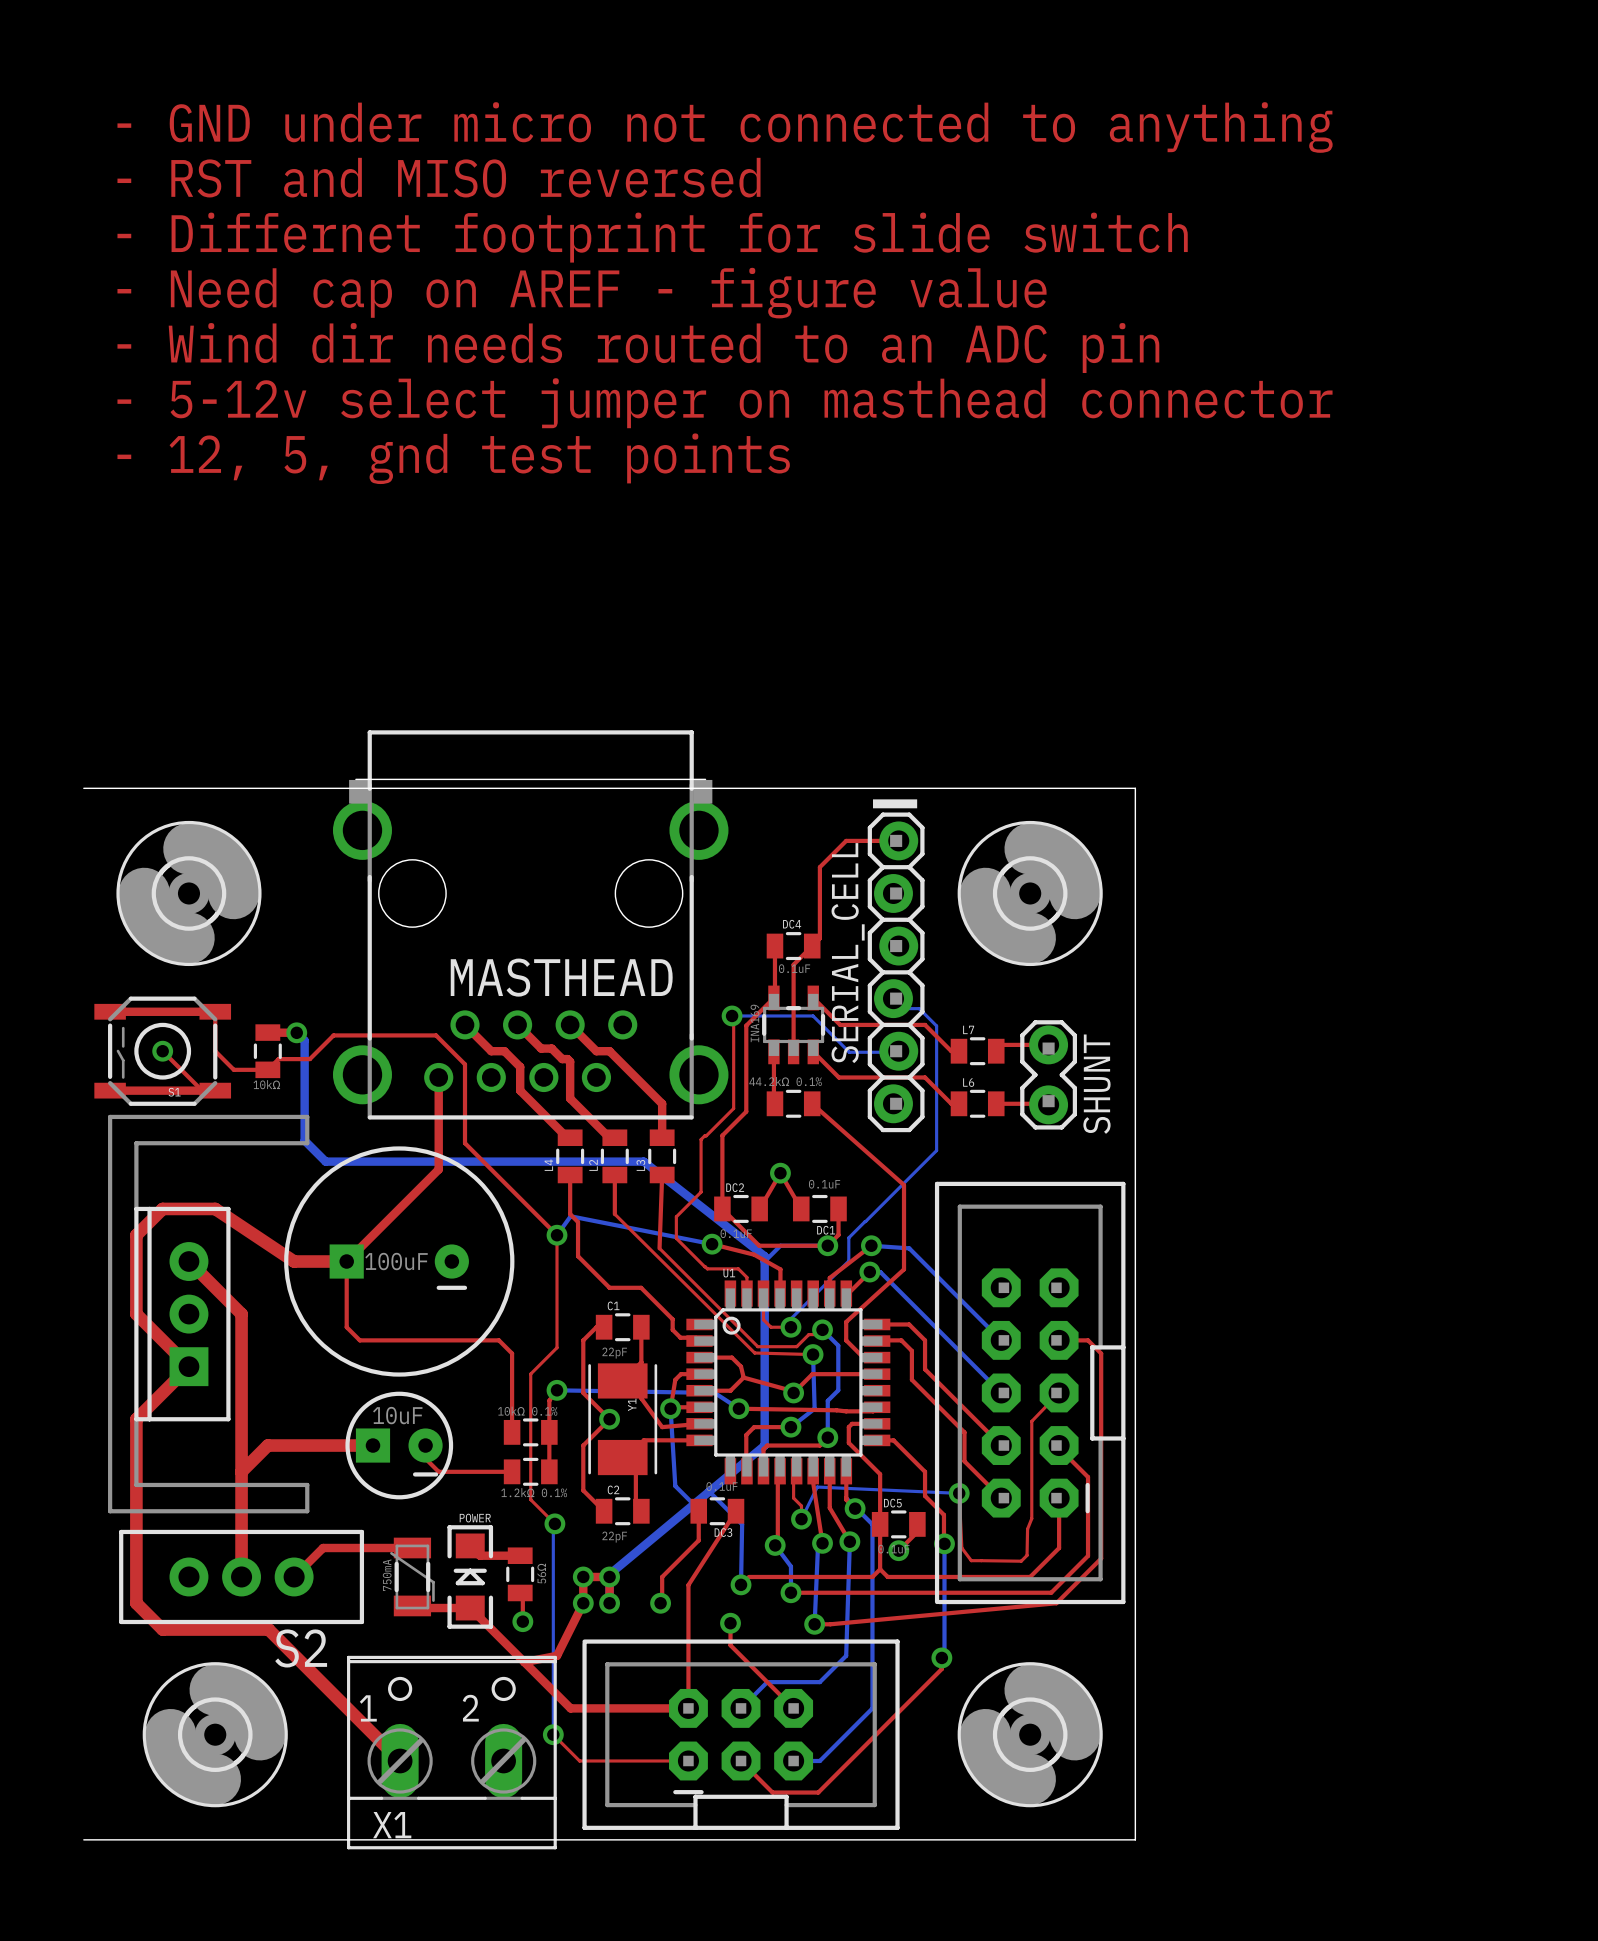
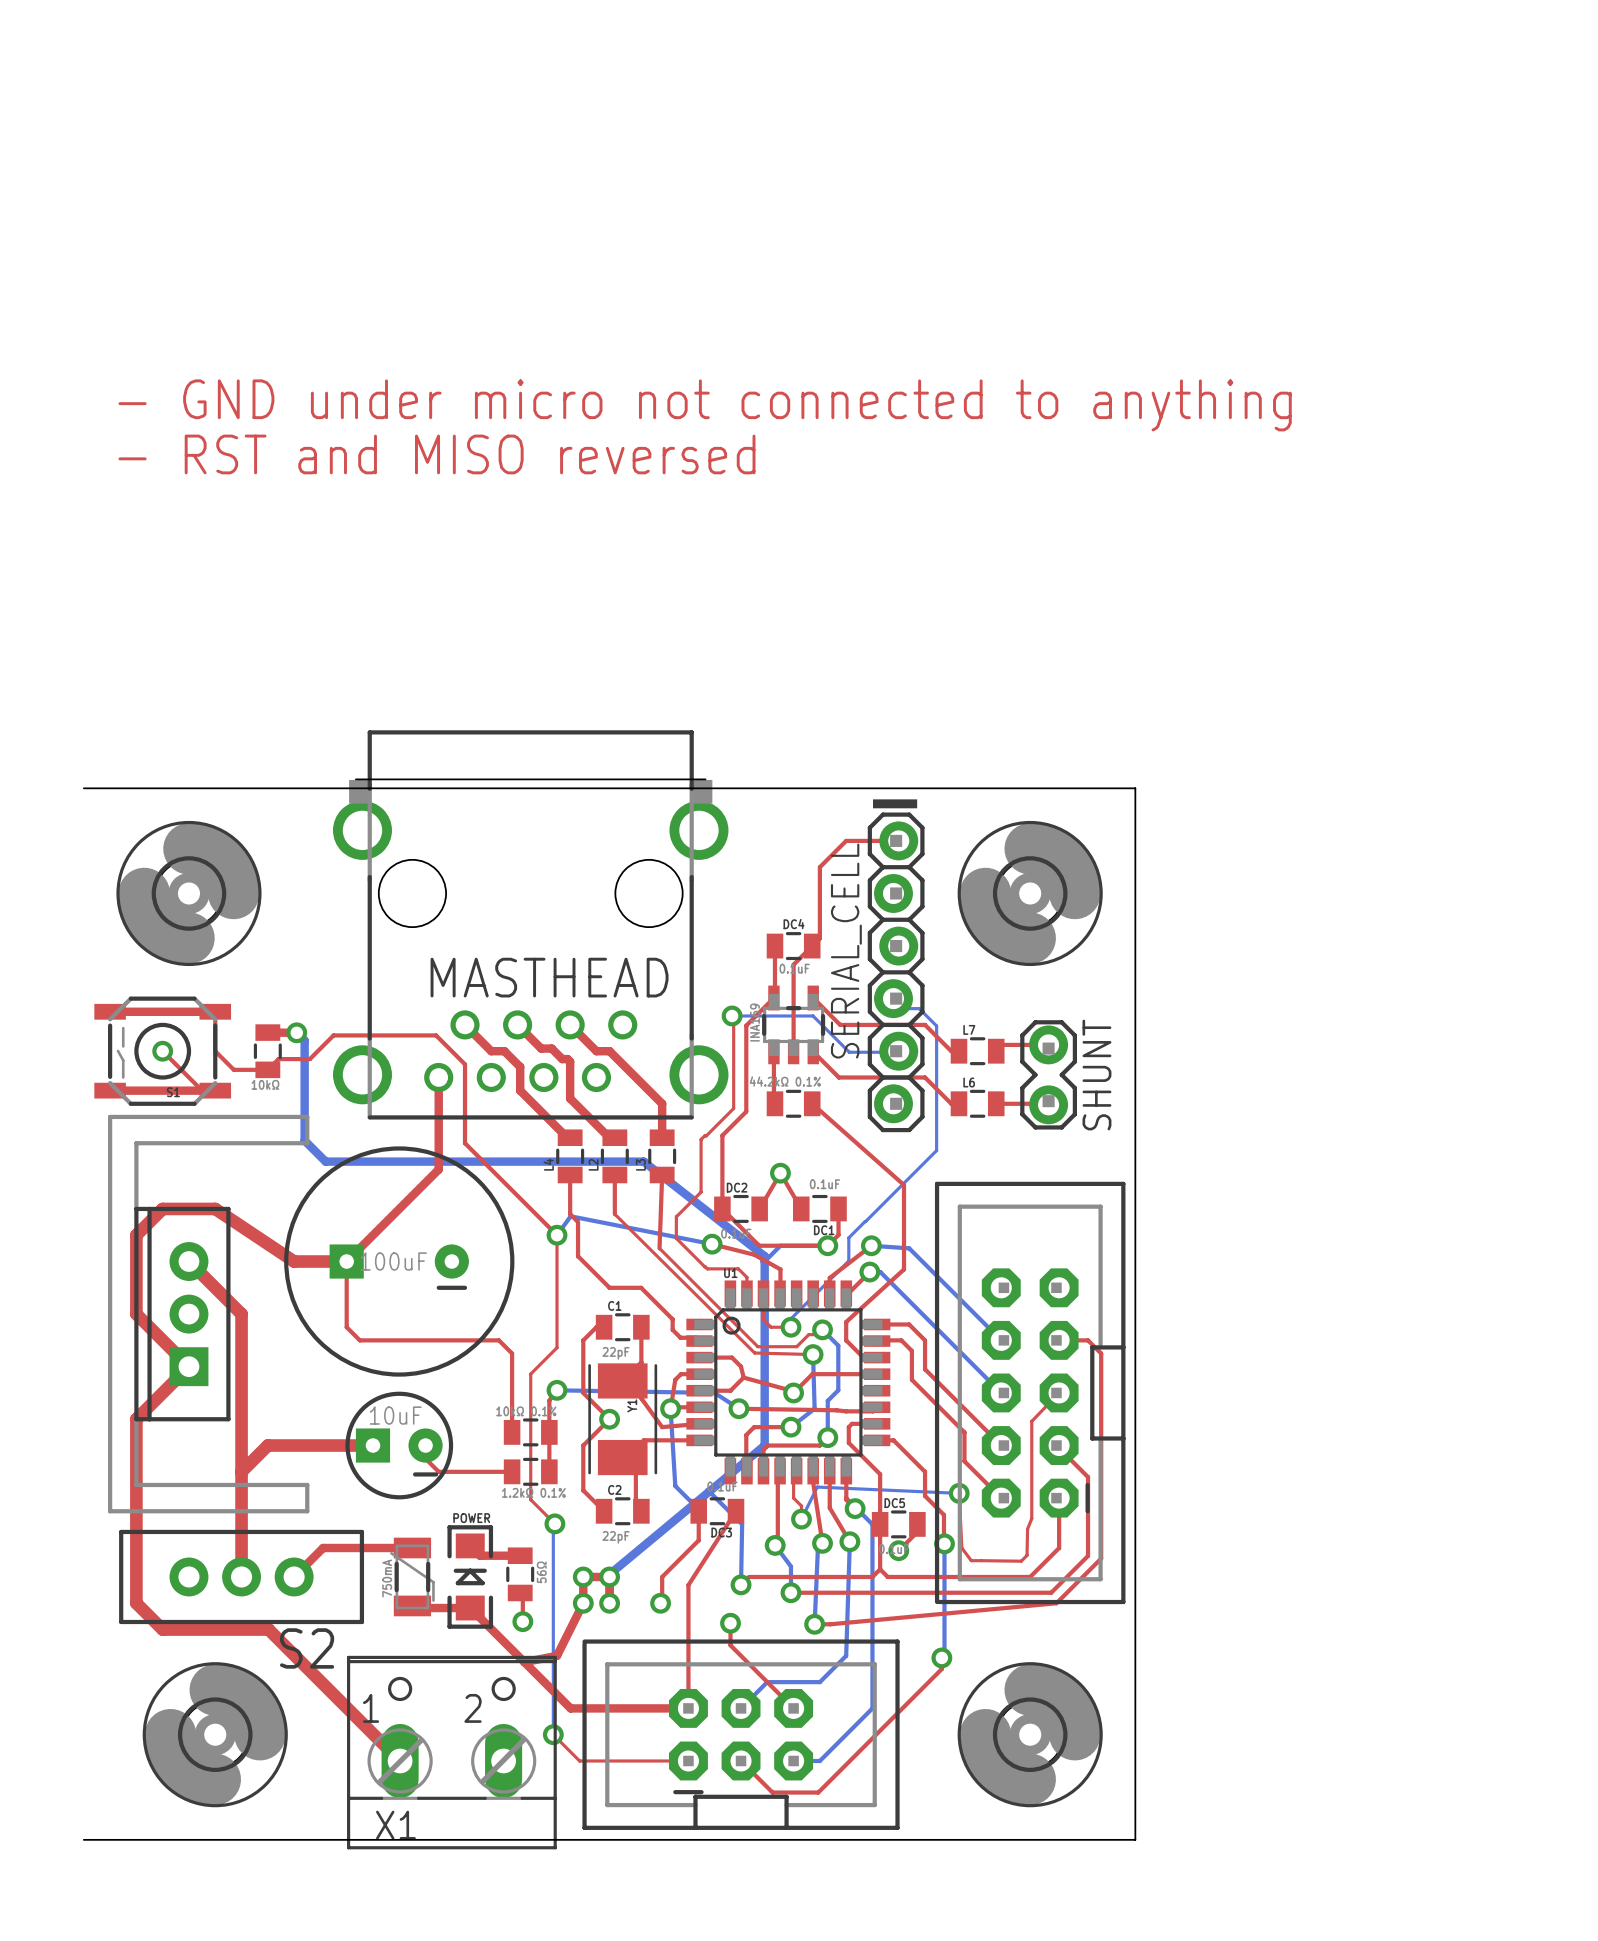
text: - GND under micro not connected to anything (725, 127) -> none
text: - RST and MISO reversed (438, 177) -> none
text: - Differnet footprint for slide switch (652, 237) -> none
text: - Need cap on AREF - figure value (582, 293) -> none
text: - Wind dir needs routed to an ADC pin (638, 348) -> none
text: - 5-12v select jumper on masthead connector (725, 403) -> - GND under micro not connected to anything (705, 405)
text: - 12, 5, gnd test points (453, 458) -> - RST and MISO reversed (436, 454)

